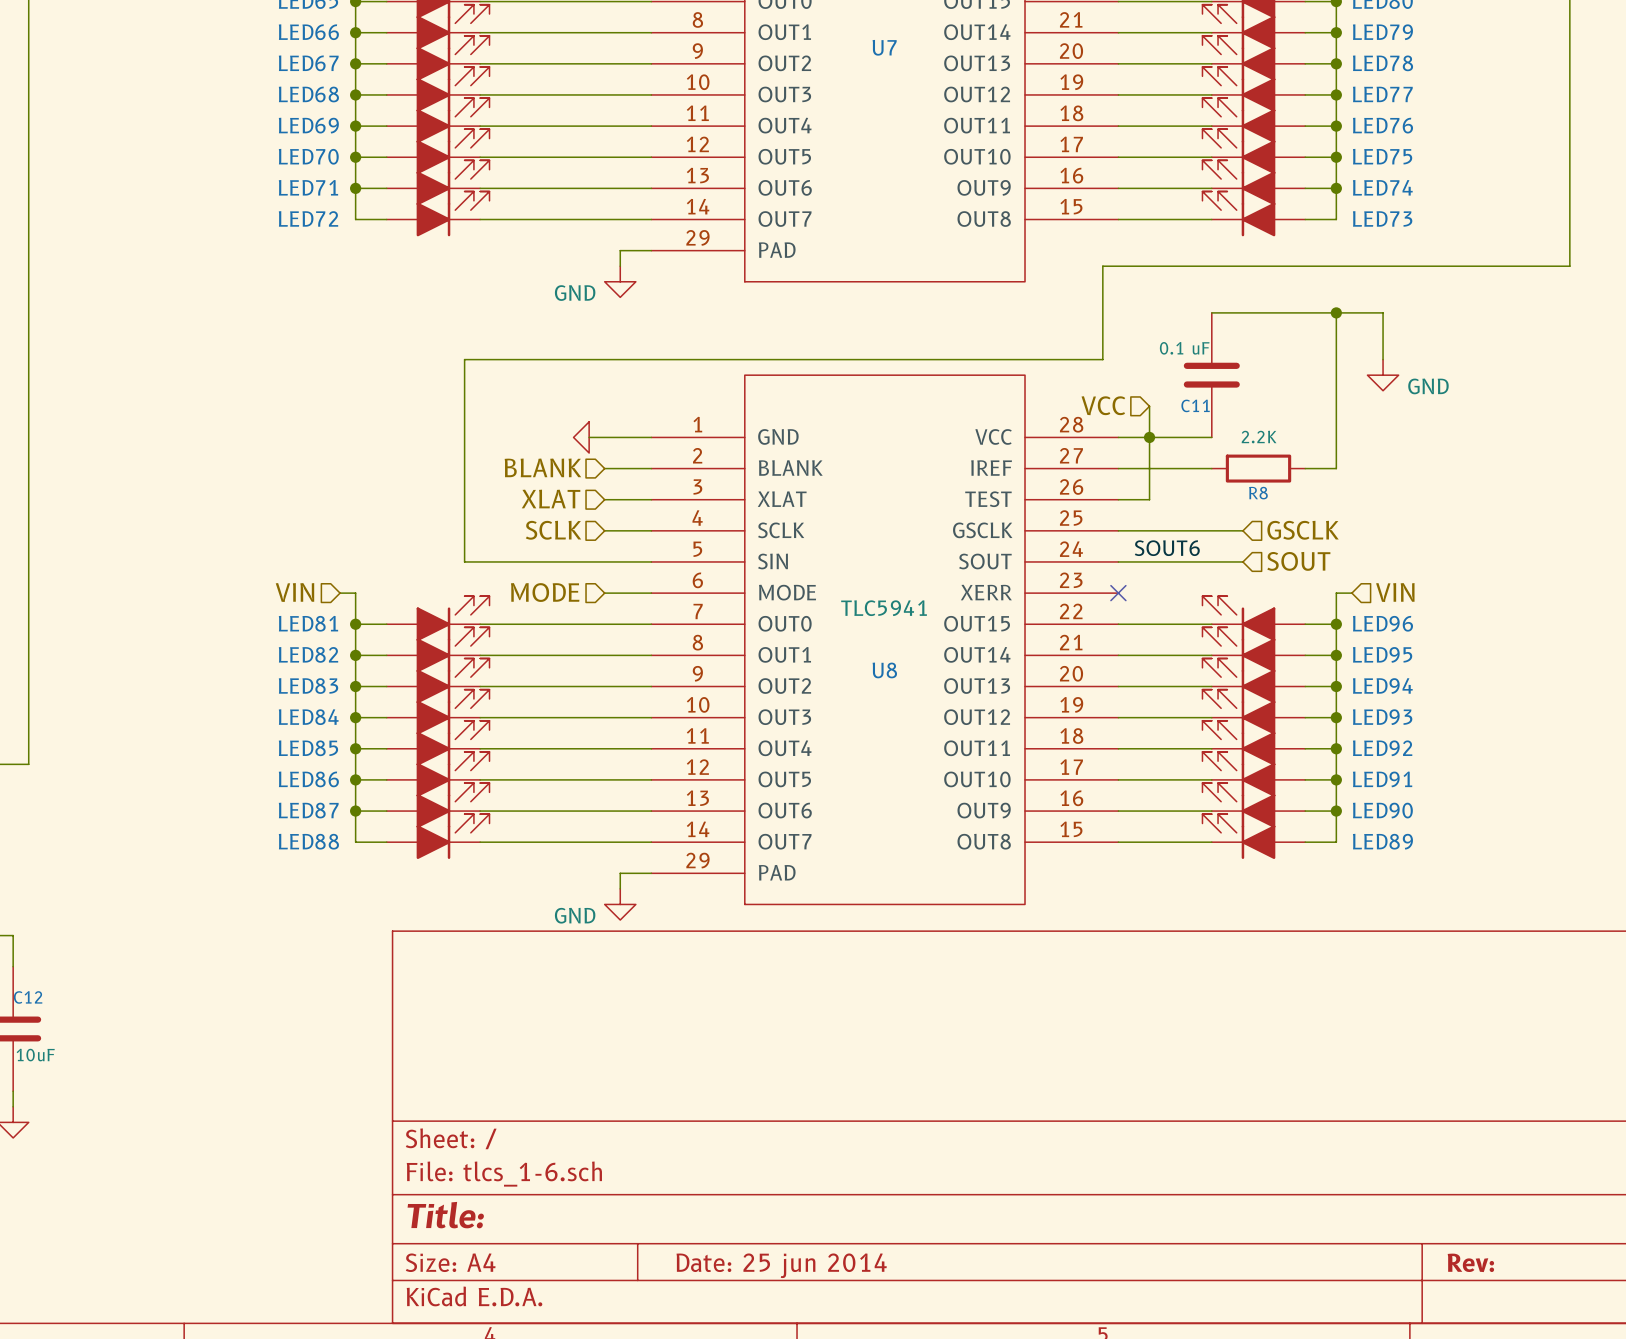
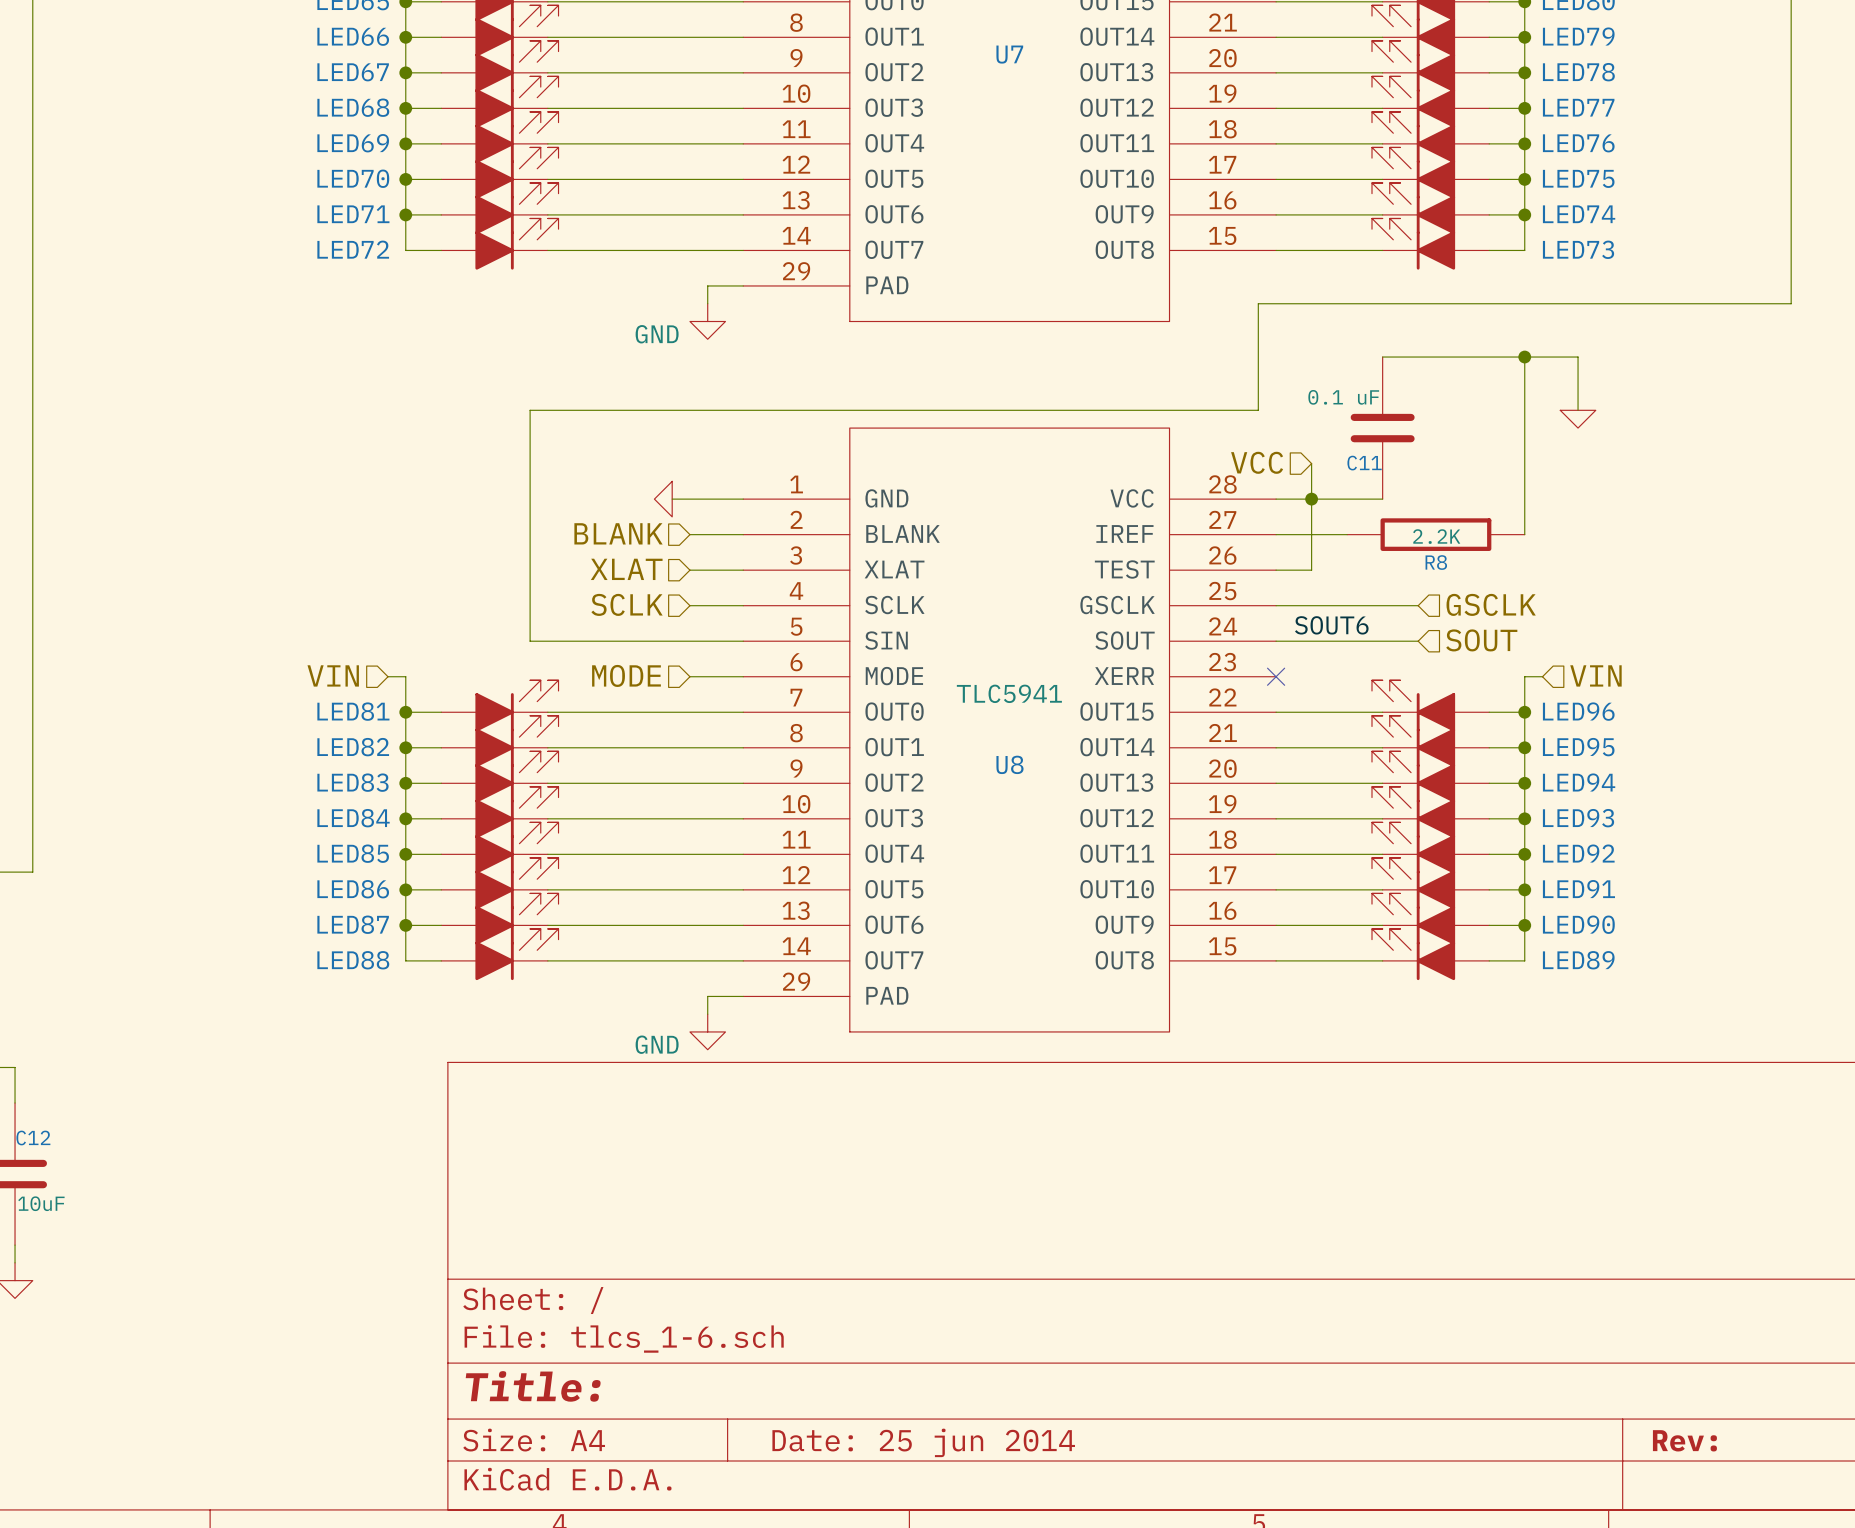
power symbol shape: [1367, 359, 1399, 391] -> [1560, 410, 1596, 429]
power symbol text: GND (1428, 386) -> none
R8 value position: 2.2K (1259, 437) -> 2.2K (1436, 536)
R8 symbol: [1211, 454, 1306, 483] -> [1347, 518, 1525, 551]

